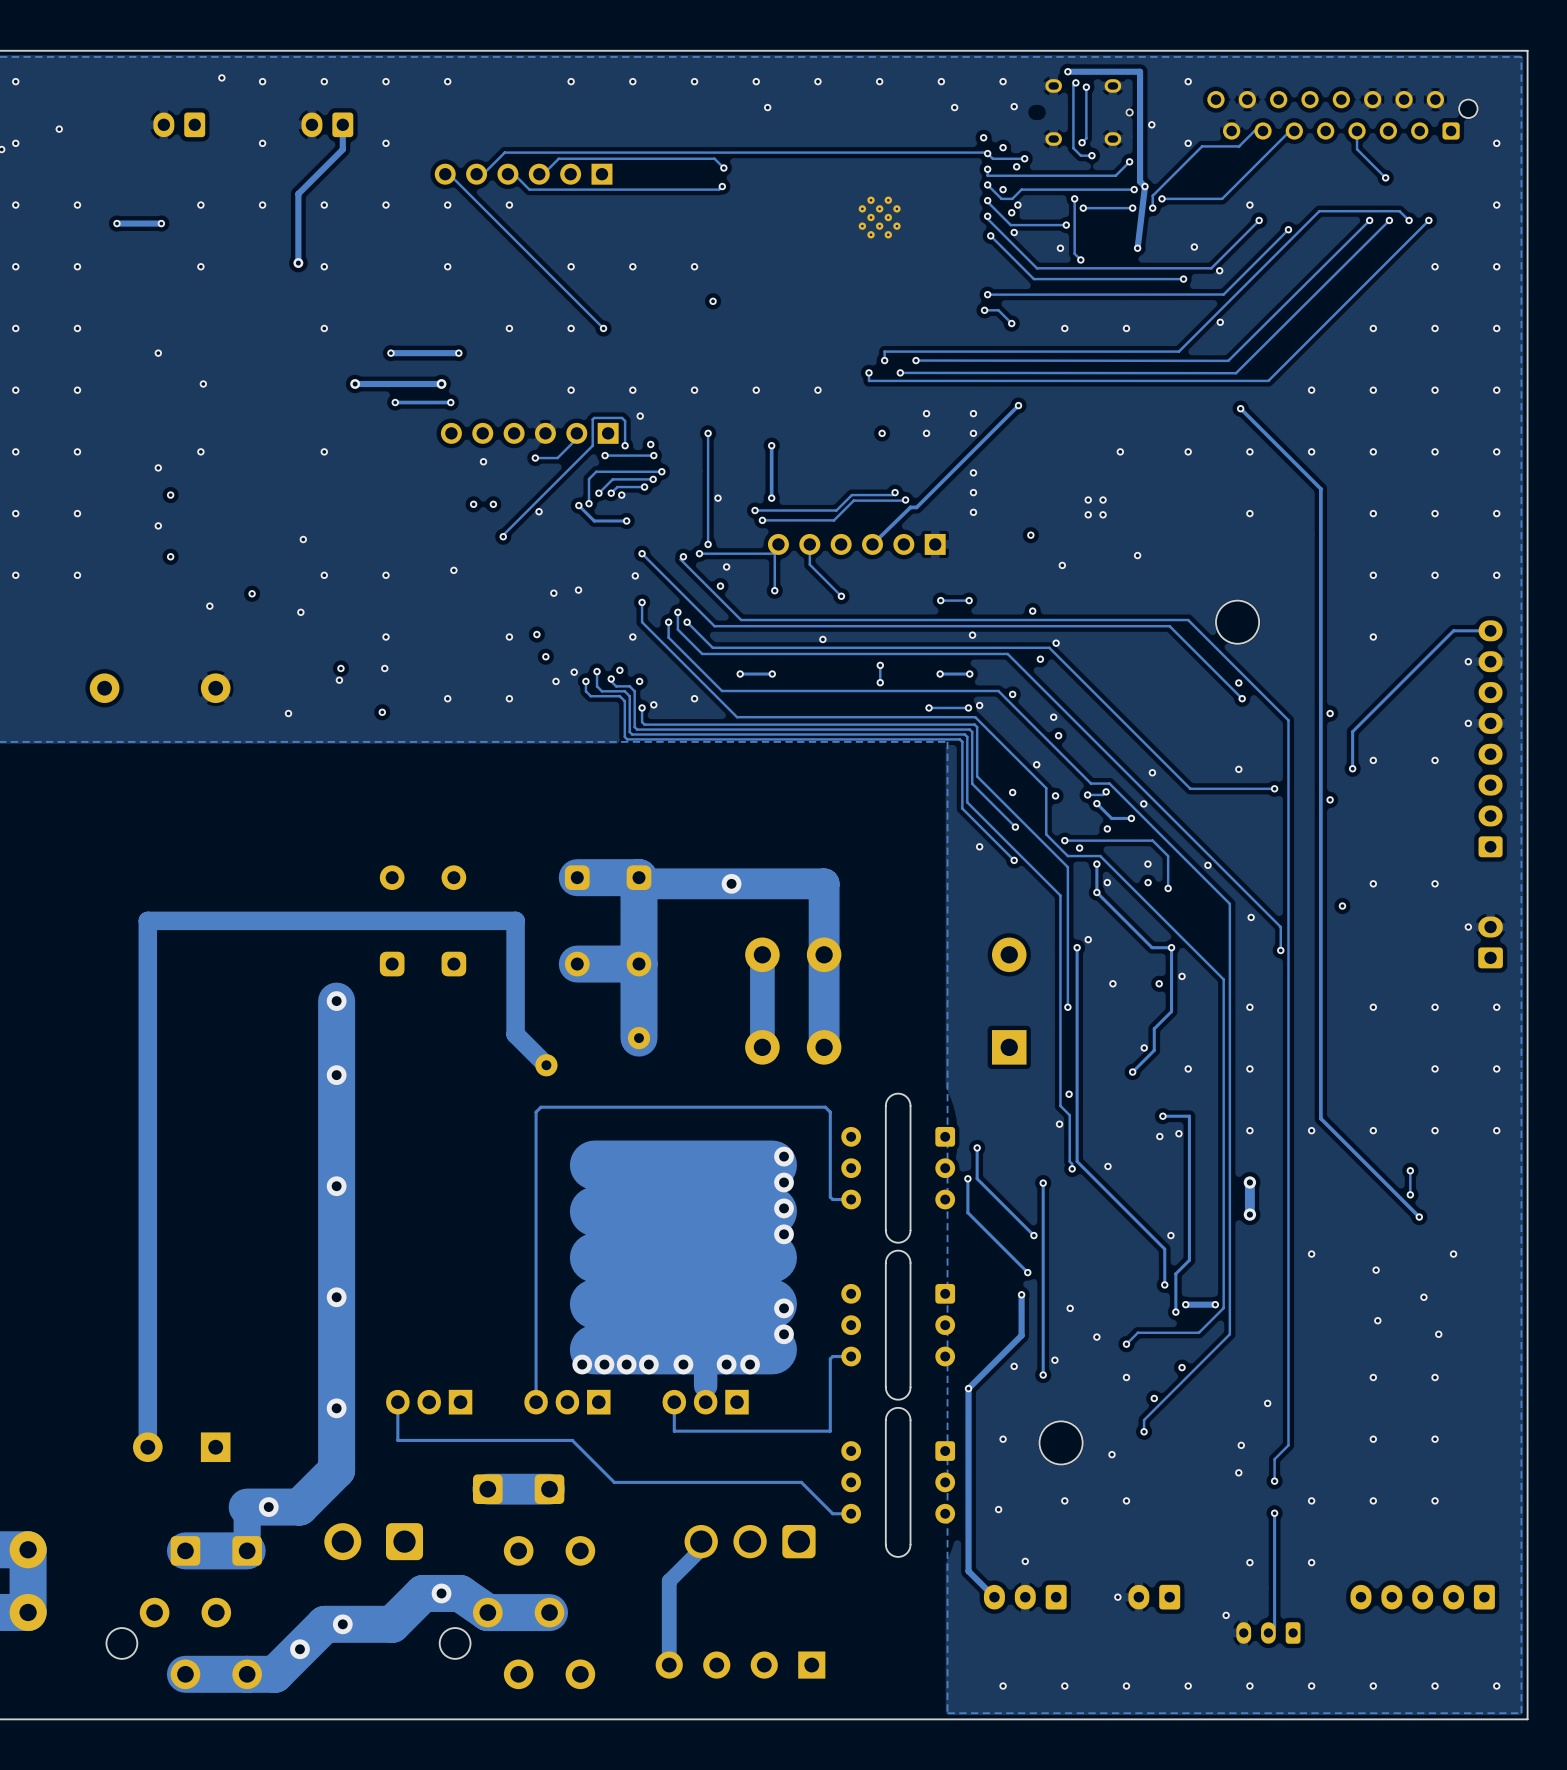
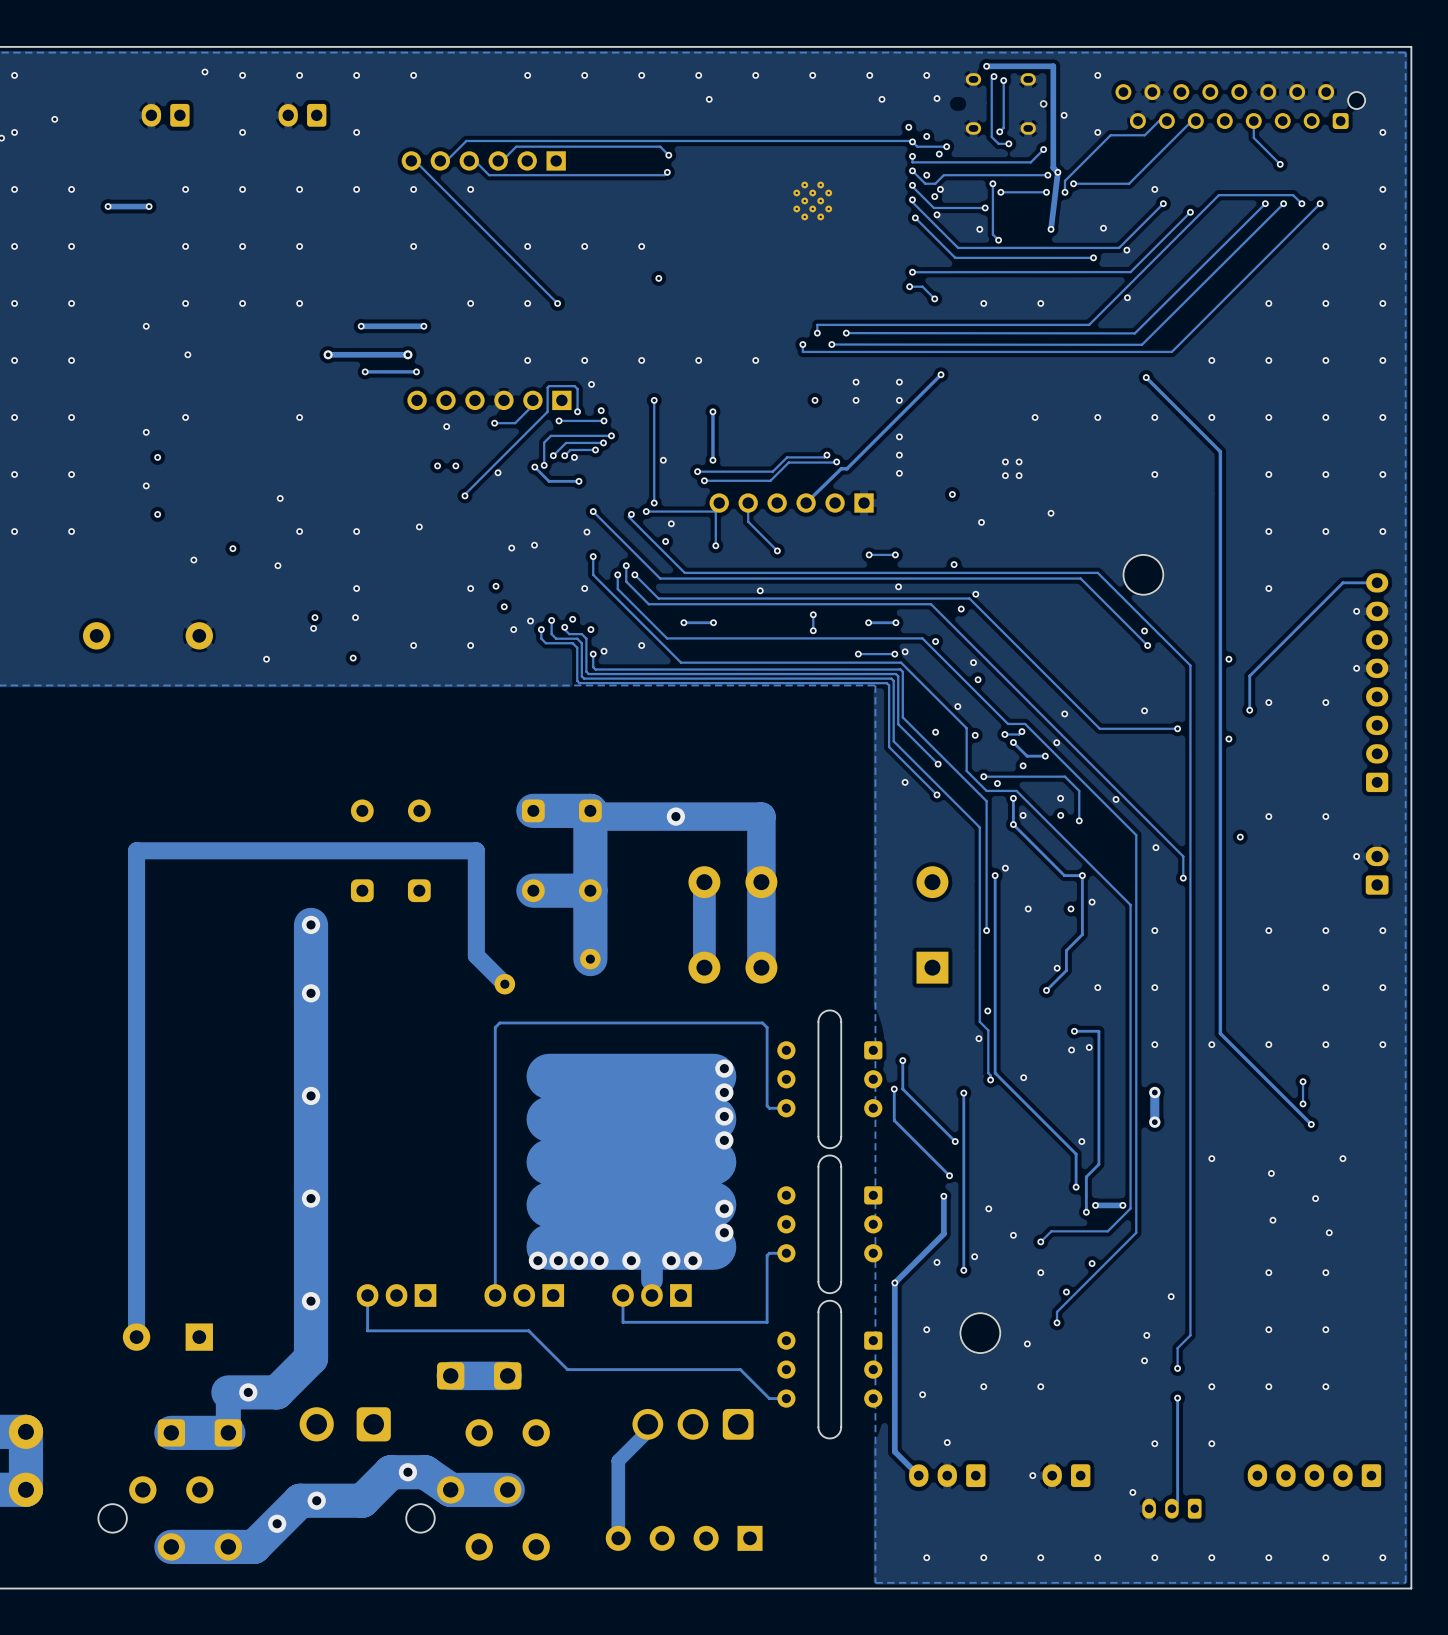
track: (342, 124) (342, 149) (298, 193) (298, 263) -> none
via: (298, 263) -> none
via: none -> (242, 246)
via: none -> (185, 303)
via: none -> (242, 303)

